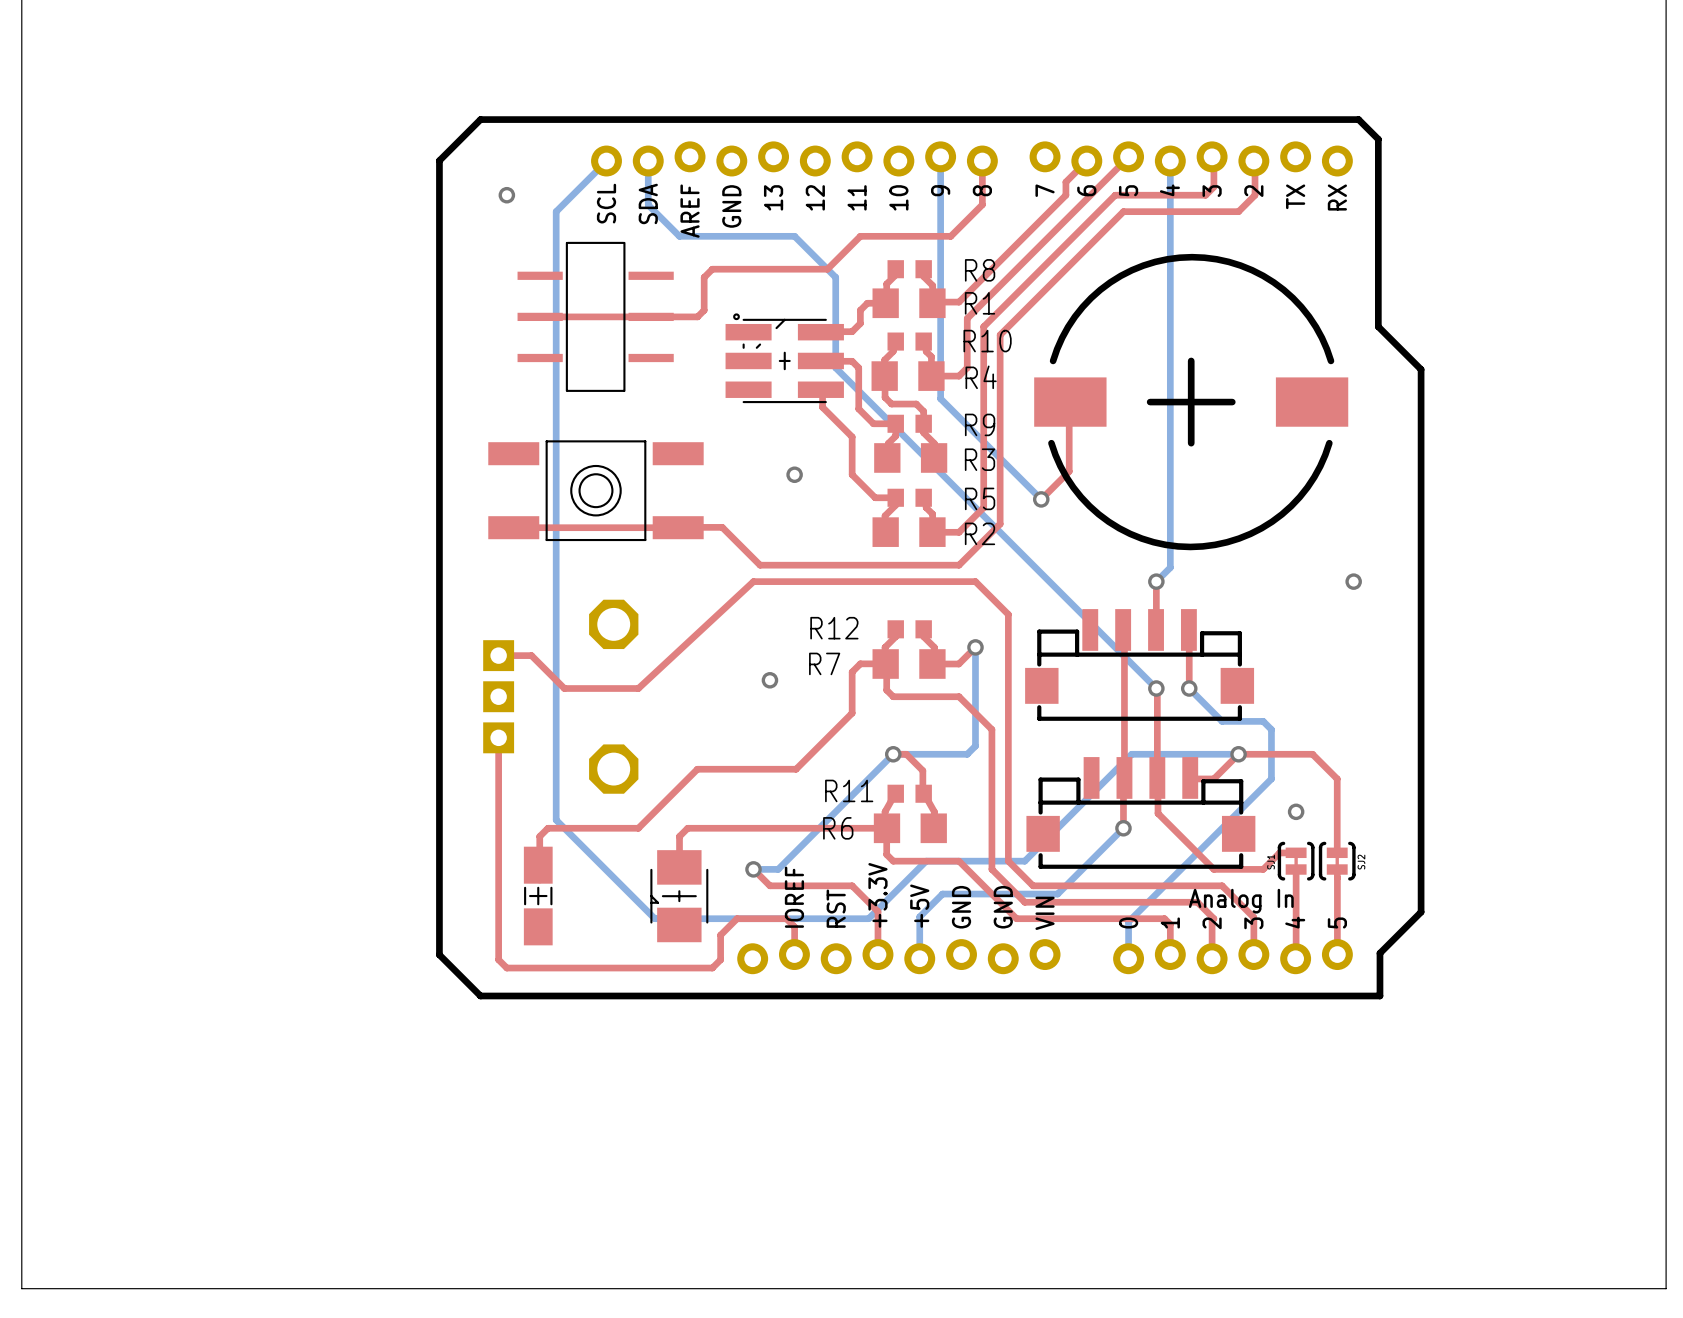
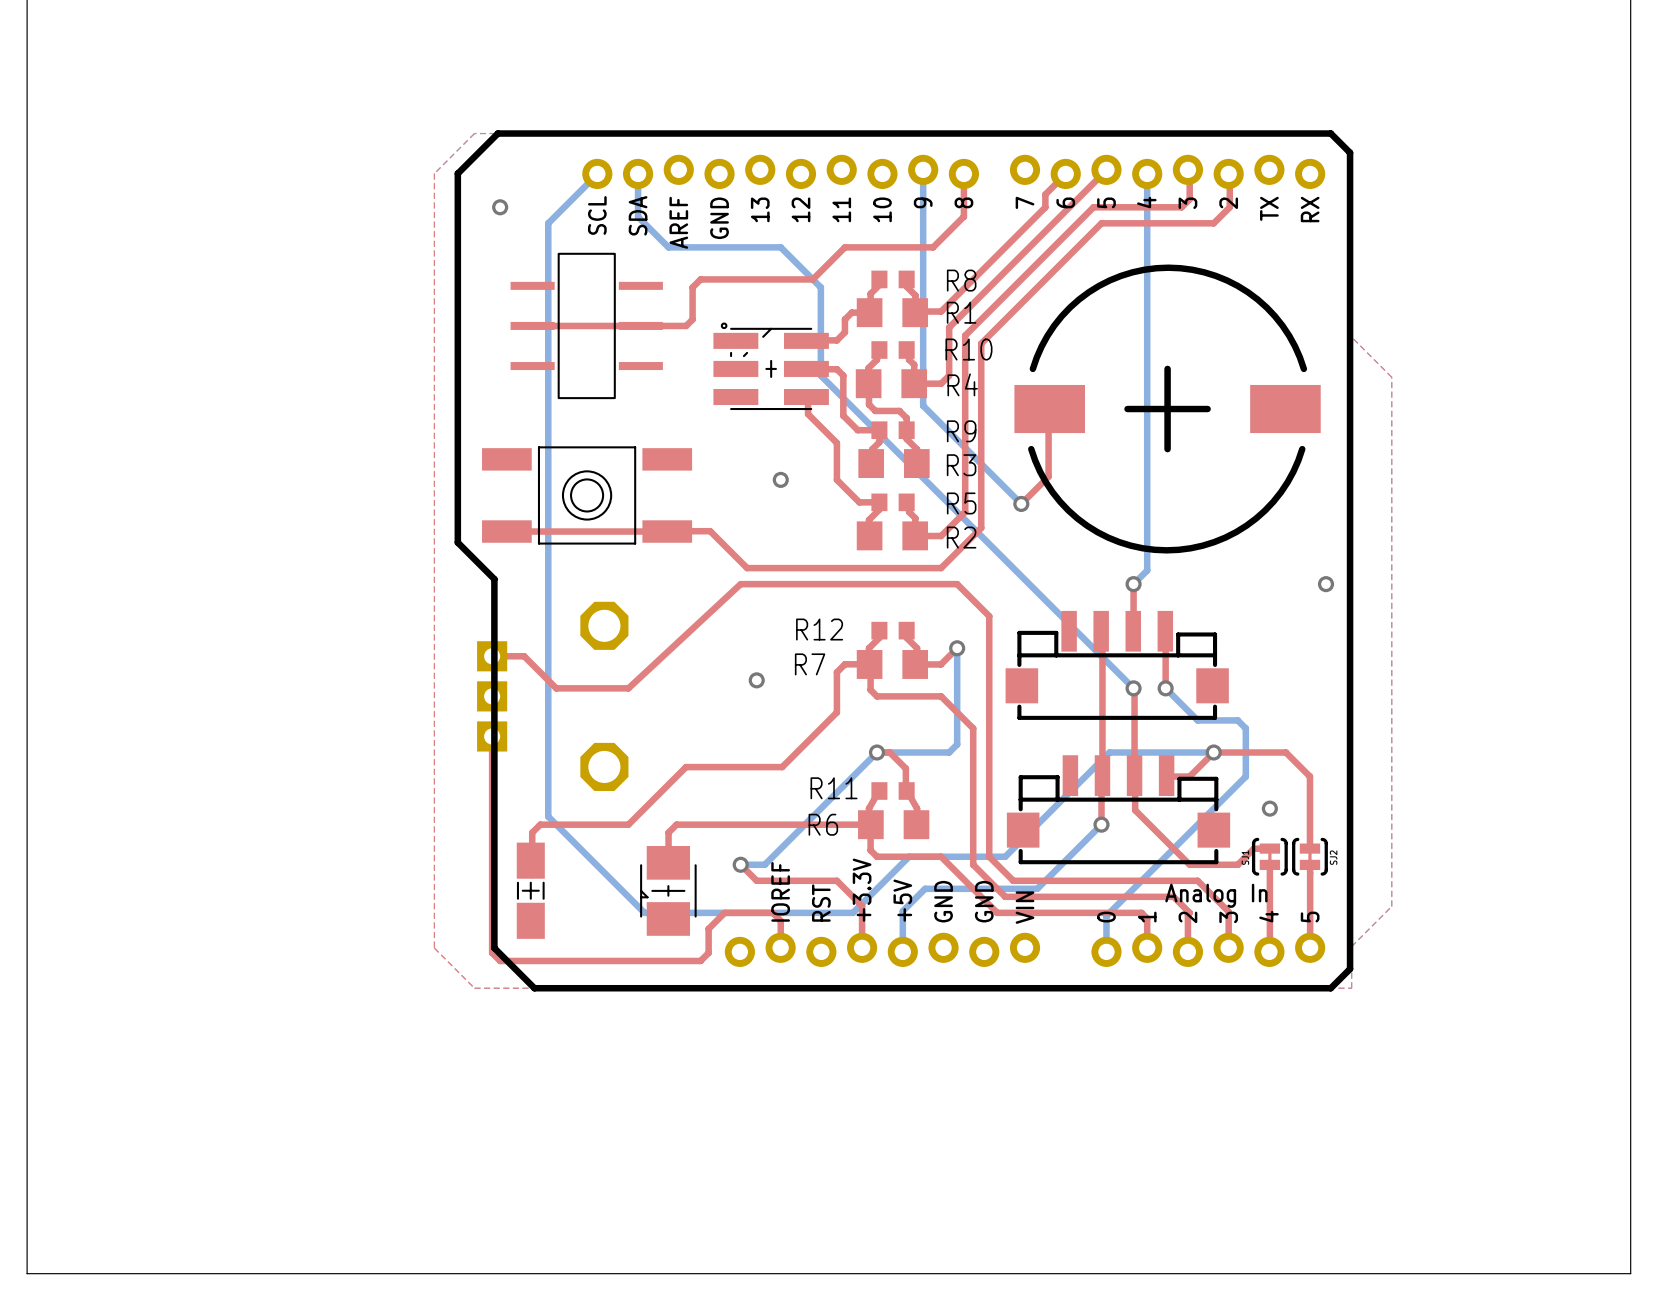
board edge: (504, 119) (480, 119) (439, 160) (439, 954) (480, 995) (542, 995) -> (497, 133) (457, 173) (457, 542) (494, 579) (494, 948) (534, 988)
board edge: (1378, 326) (1421, 369) (1421, 912) (1379, 953) (1379, 995) (1358, 995) -> (1350, 335) (1350, 968) (1330, 988)

